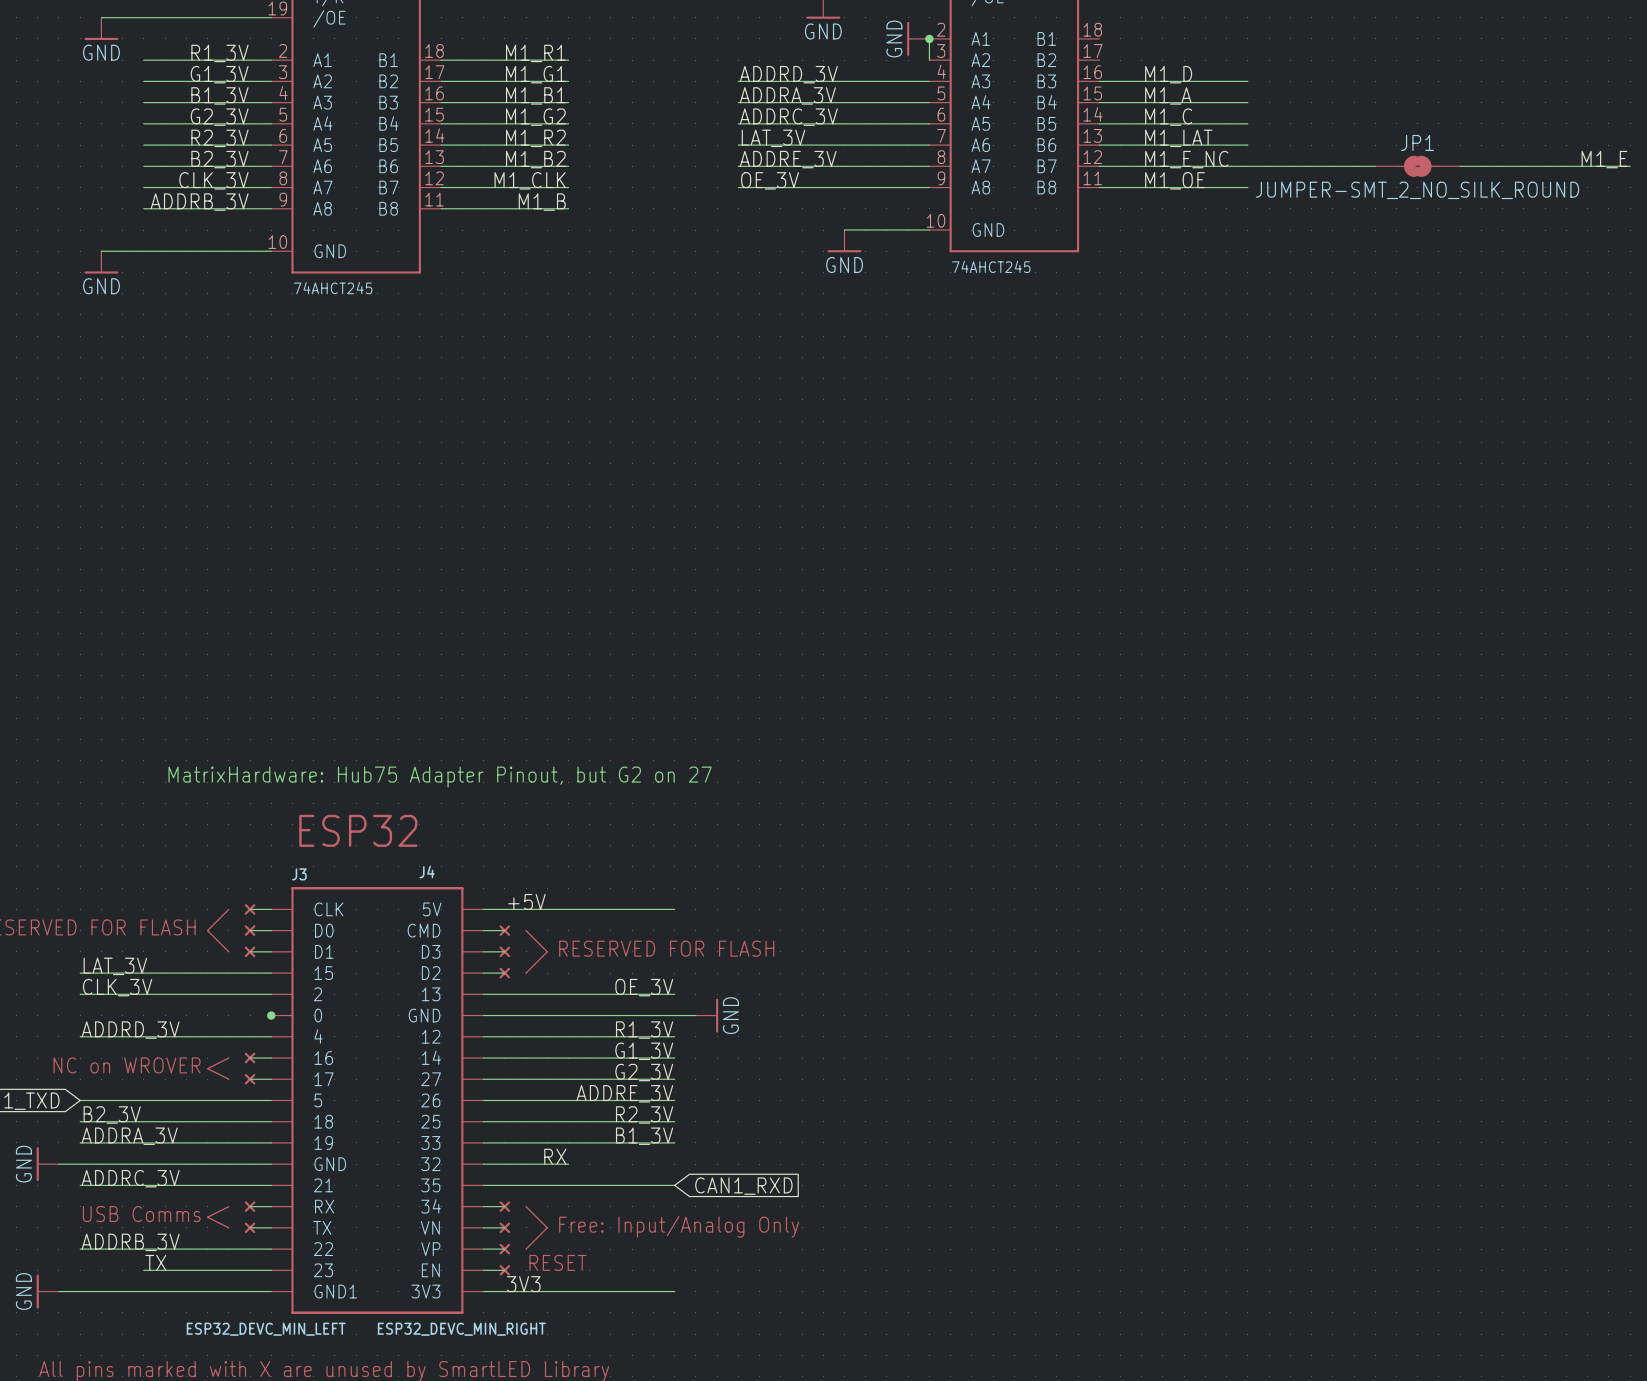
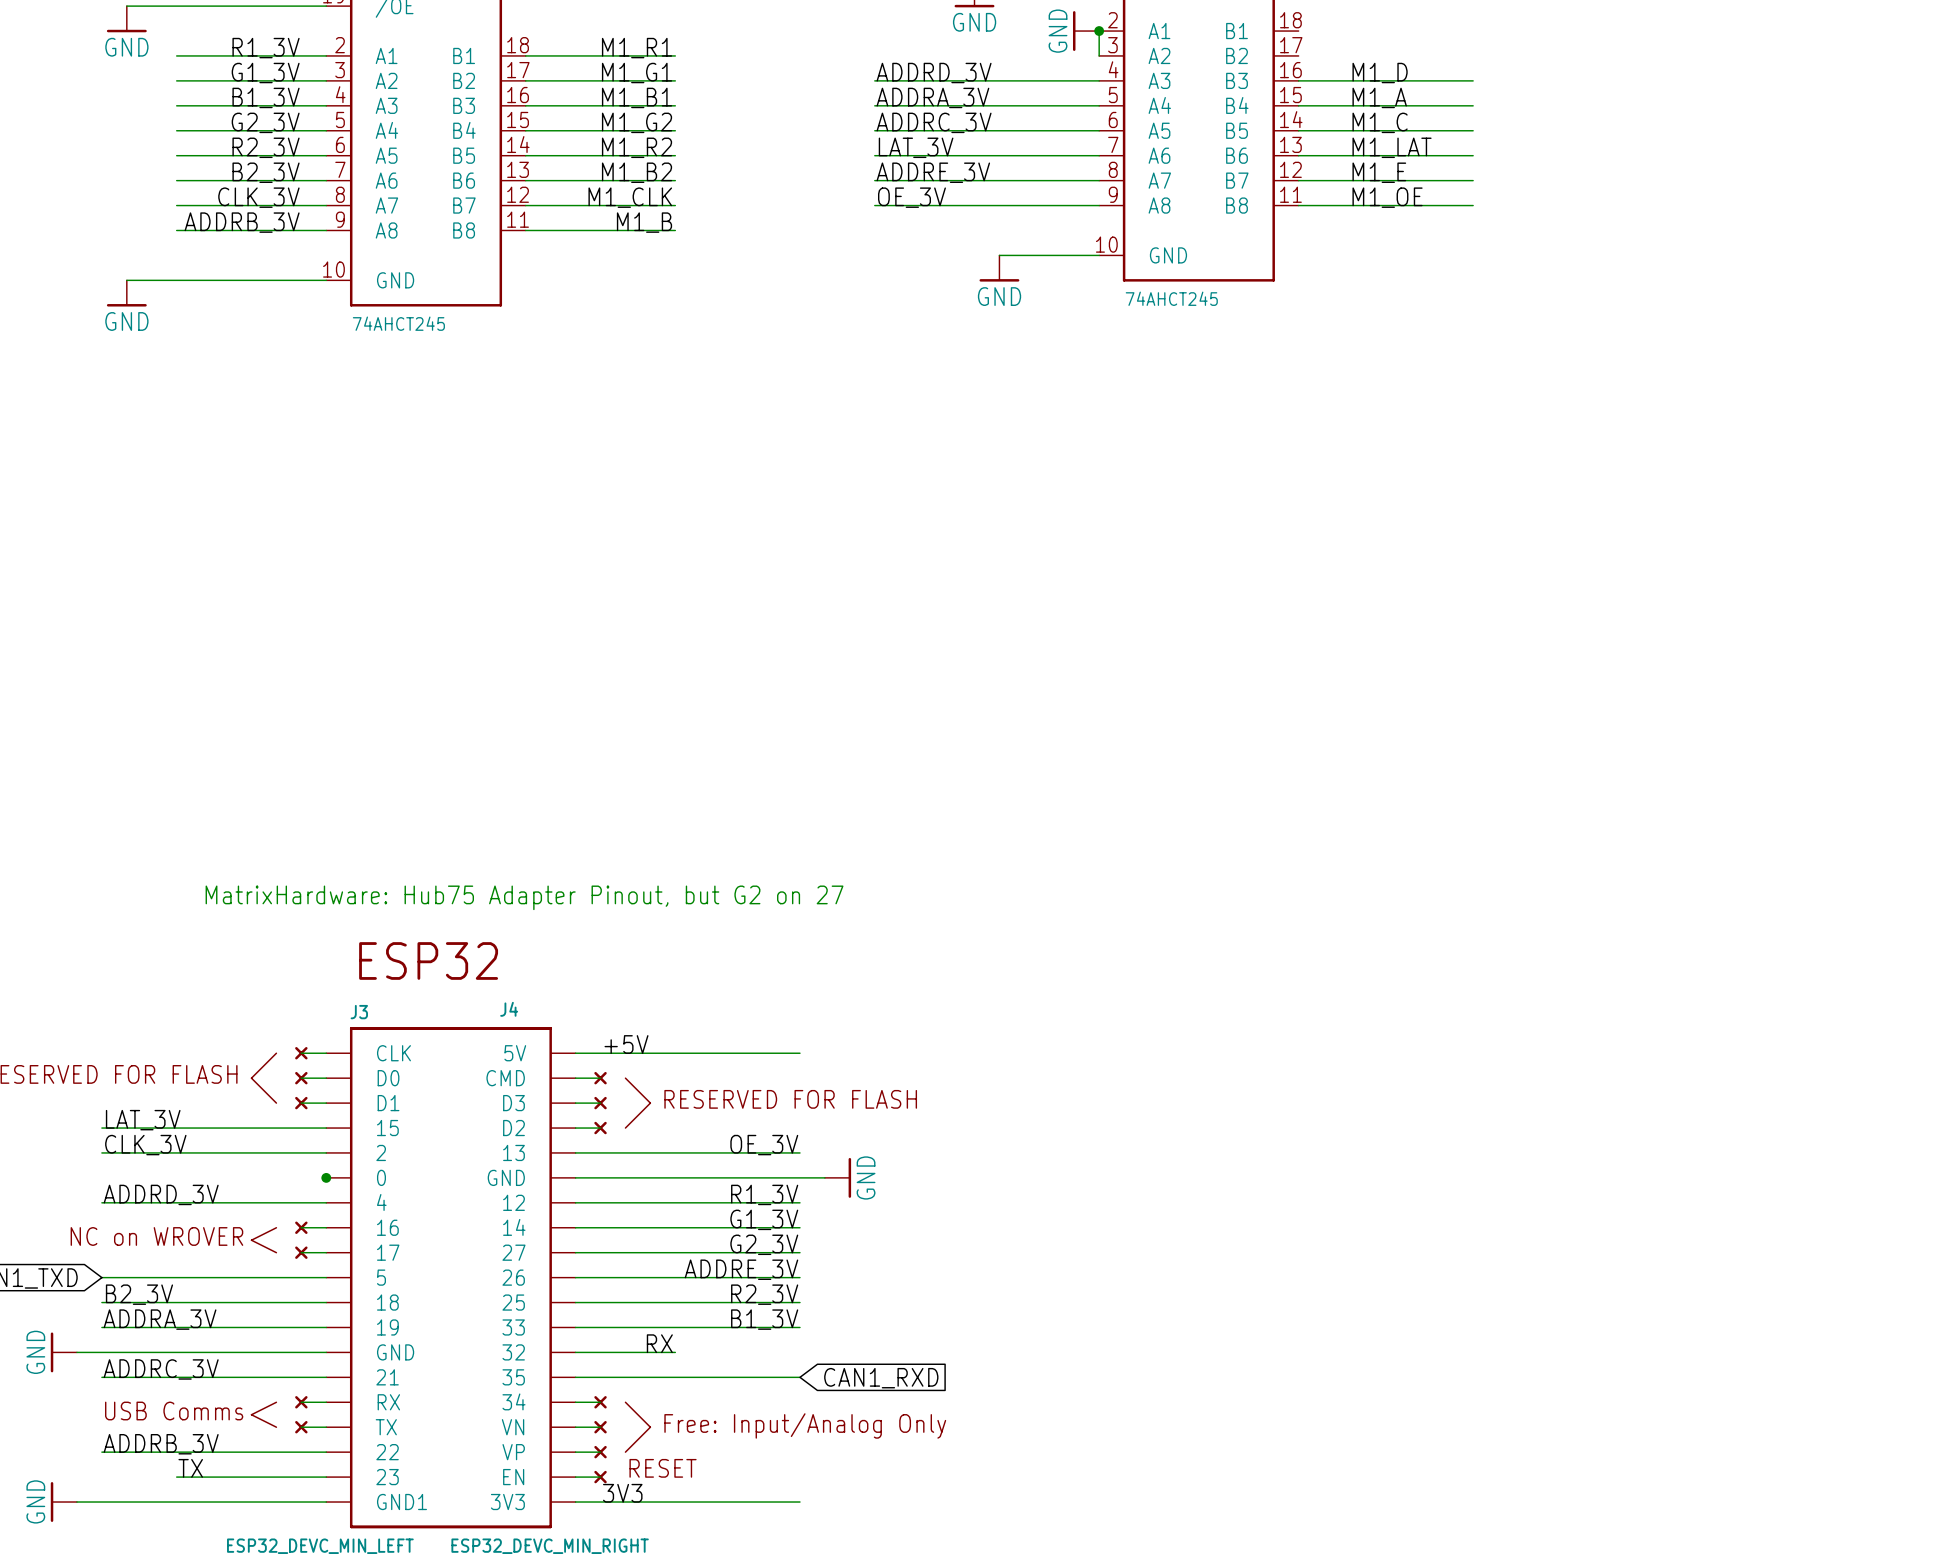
label: M1_E_NC (1186, 159) -> M1_E (1379, 172)
label: M1_E (1604, 159) -> none
wire: (1247, 166) (1375, 166) -> none
JP1: JUMPER-SMT_2_NO_SILK_ROUND (1417, 166) -> none
wire: (1460, 166) (1630, 166) -> none

